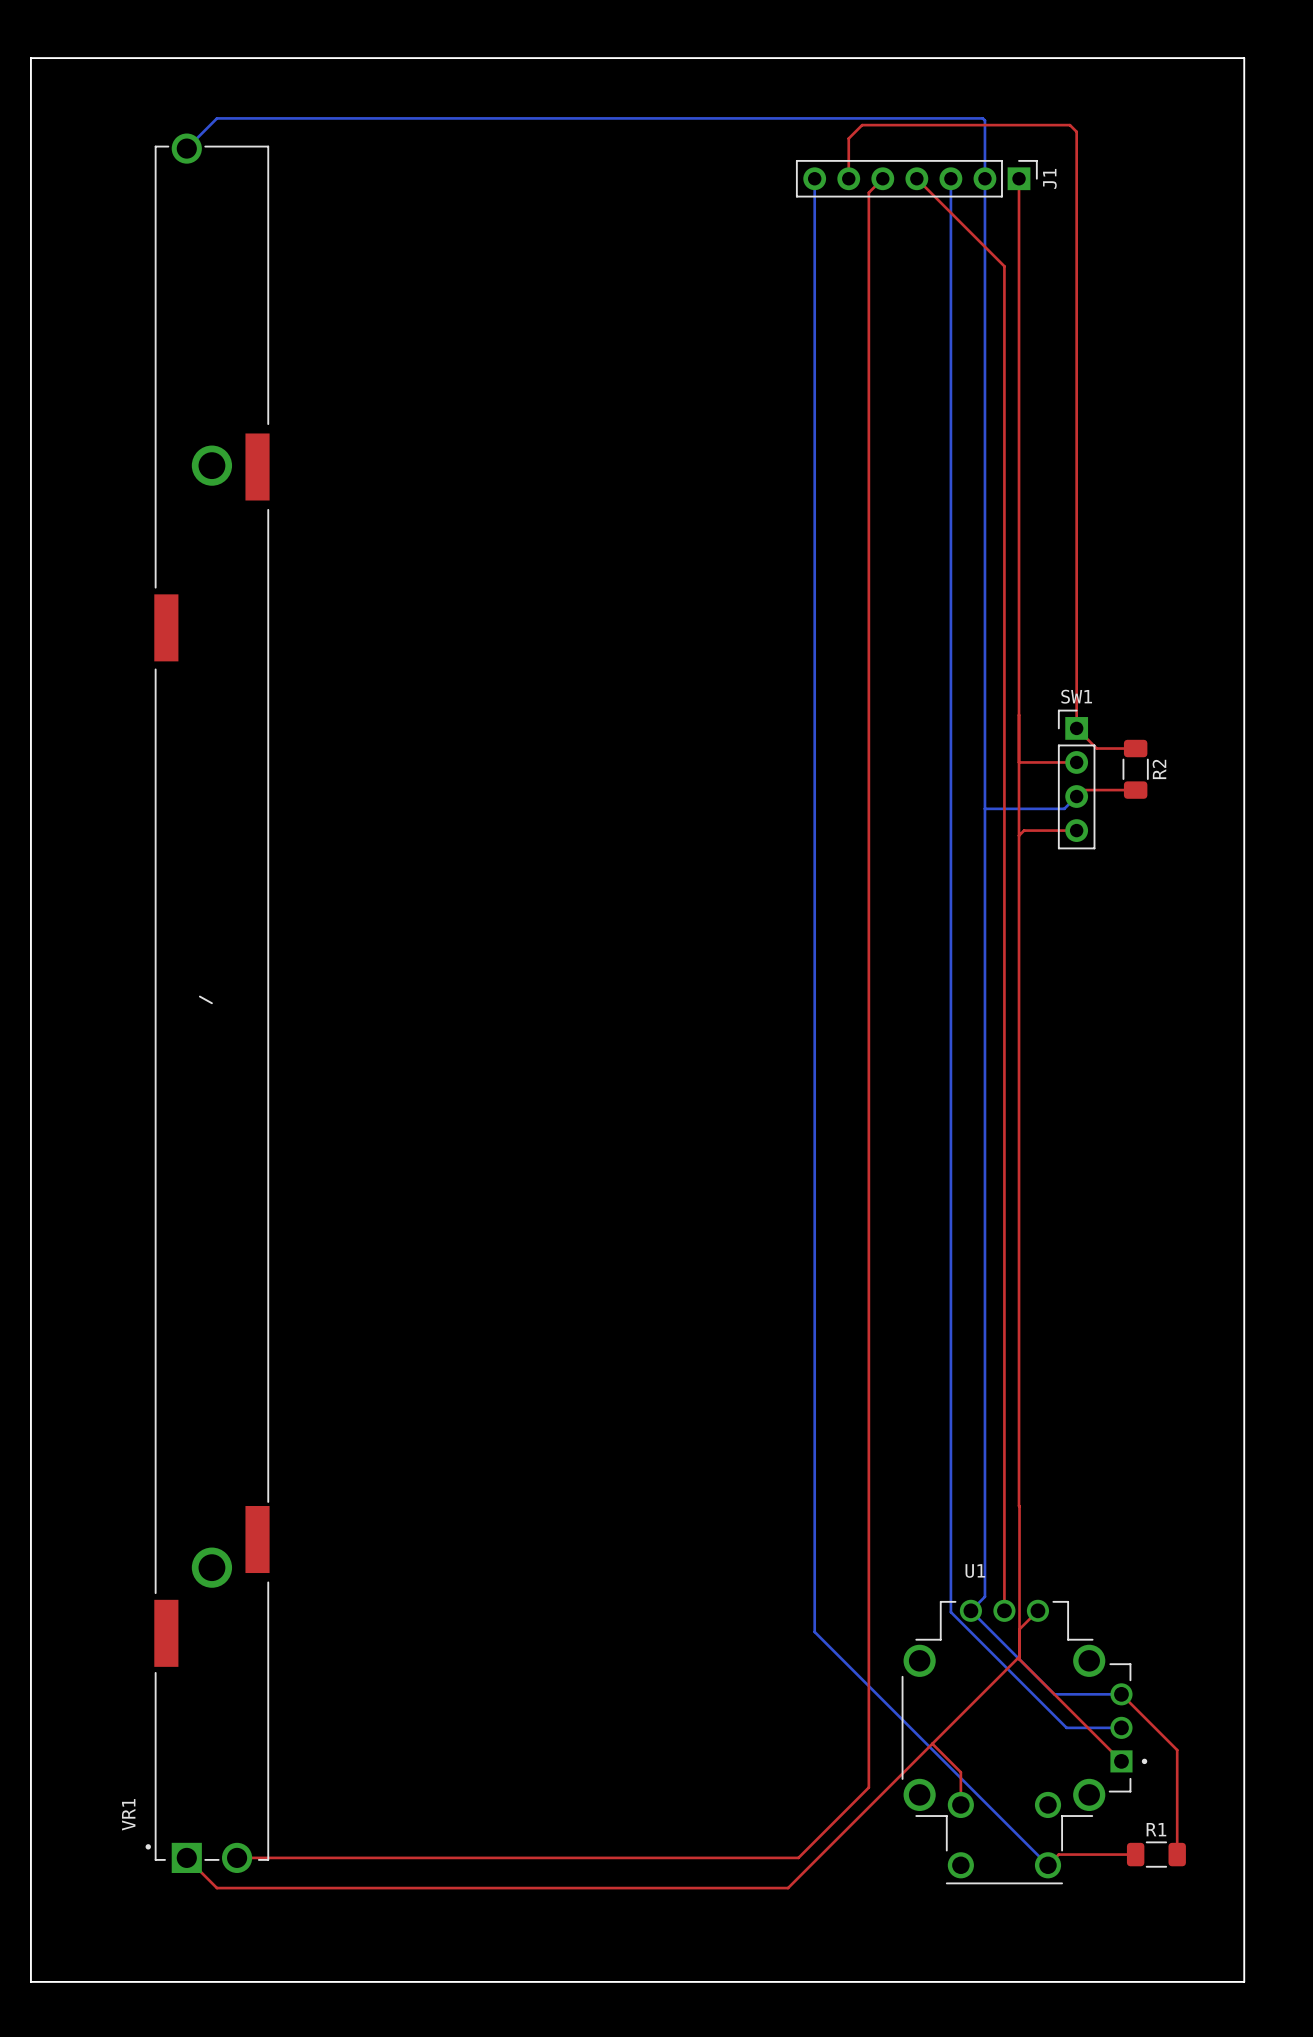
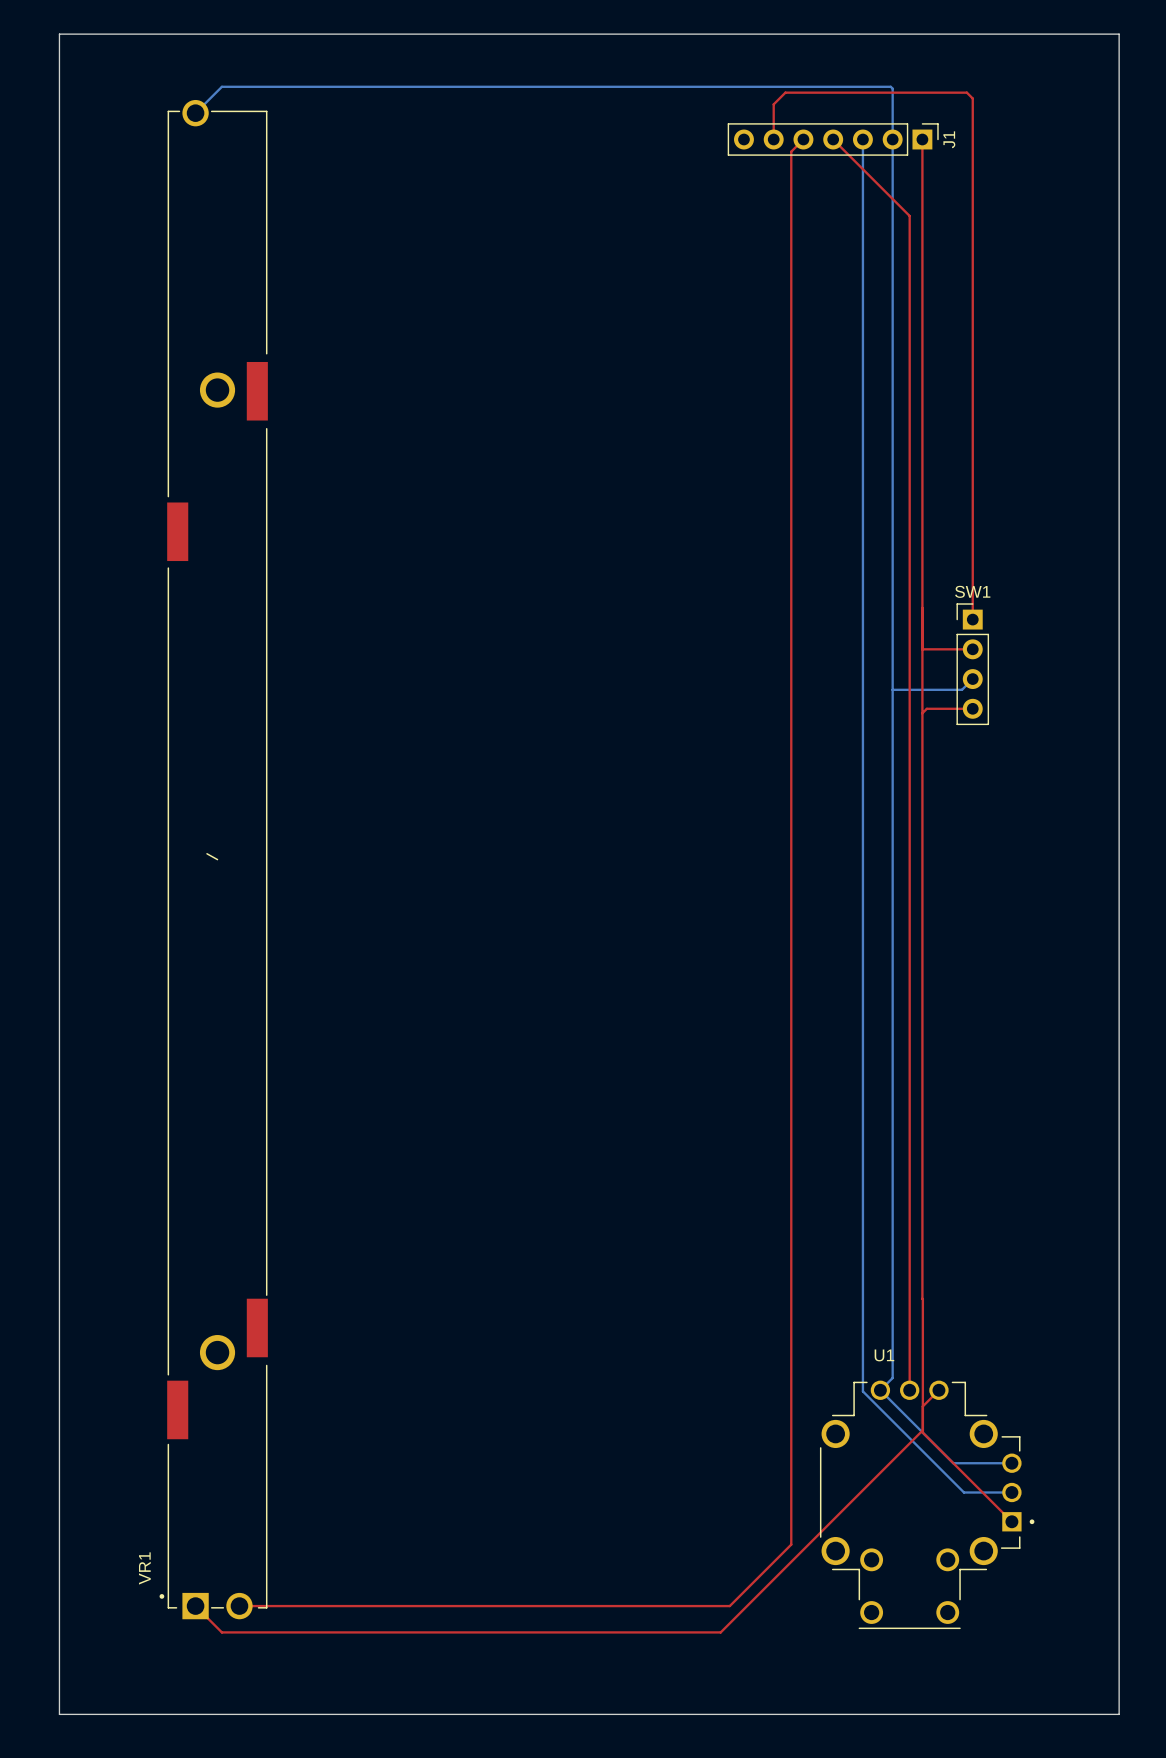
bottom track: (814, 178) (814, 1631) (1048, 1865) -> none
top track: (1076, 728) (1096, 748) (1135, 748) -> none
R2: (1135, 769) -> none
top track: (1135, 790) (1083, 790) (1076, 796) -> none
top track: (1121, 1694) (1177, 1750) (1177, 1854) -> none
top track: (932, 1743) (960, 1772) (960, 1804) -> none
top track: (1135, 1854) (1058, 1854) (1048, 1865) -> none
R1: (1156, 1854) -> none

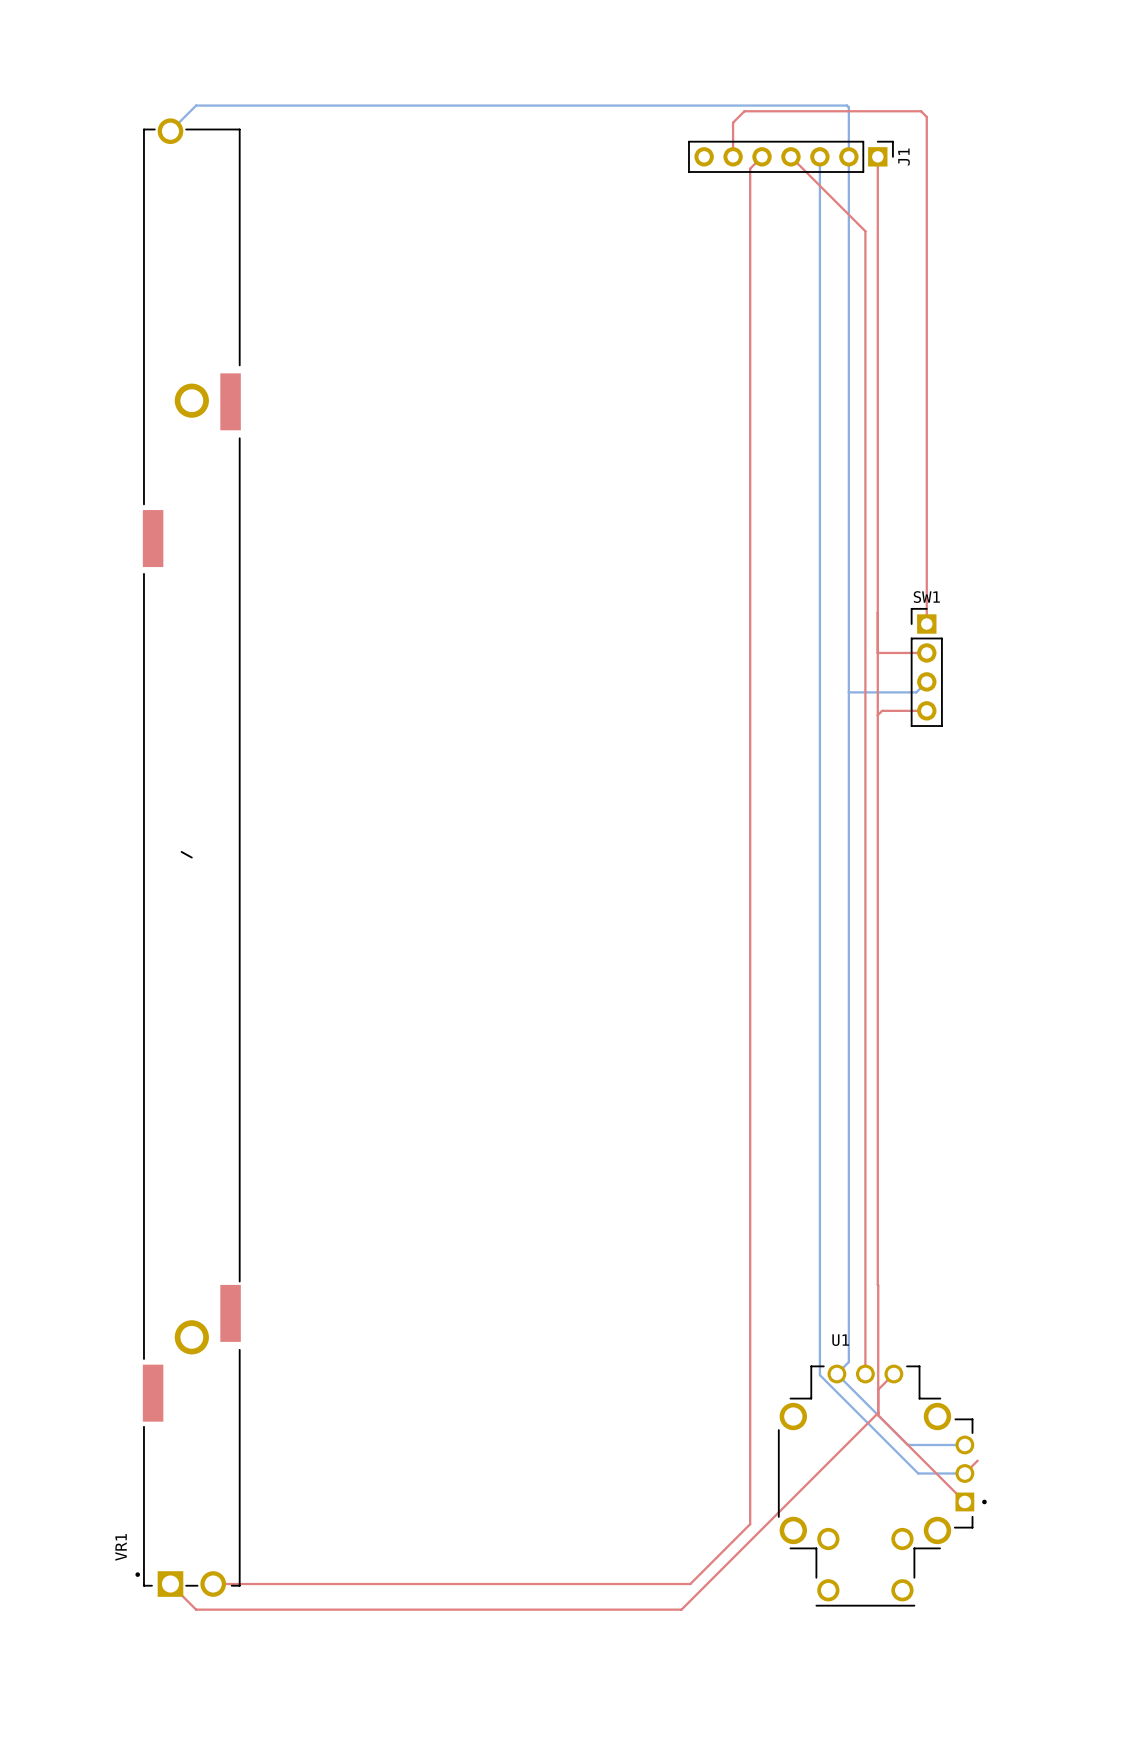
board edge: (59, 34) (1119, 34) (1119, 1714) (59, 1714) (59, 34) -> none
top track: none -> (977, 1460) (964, 1473)

